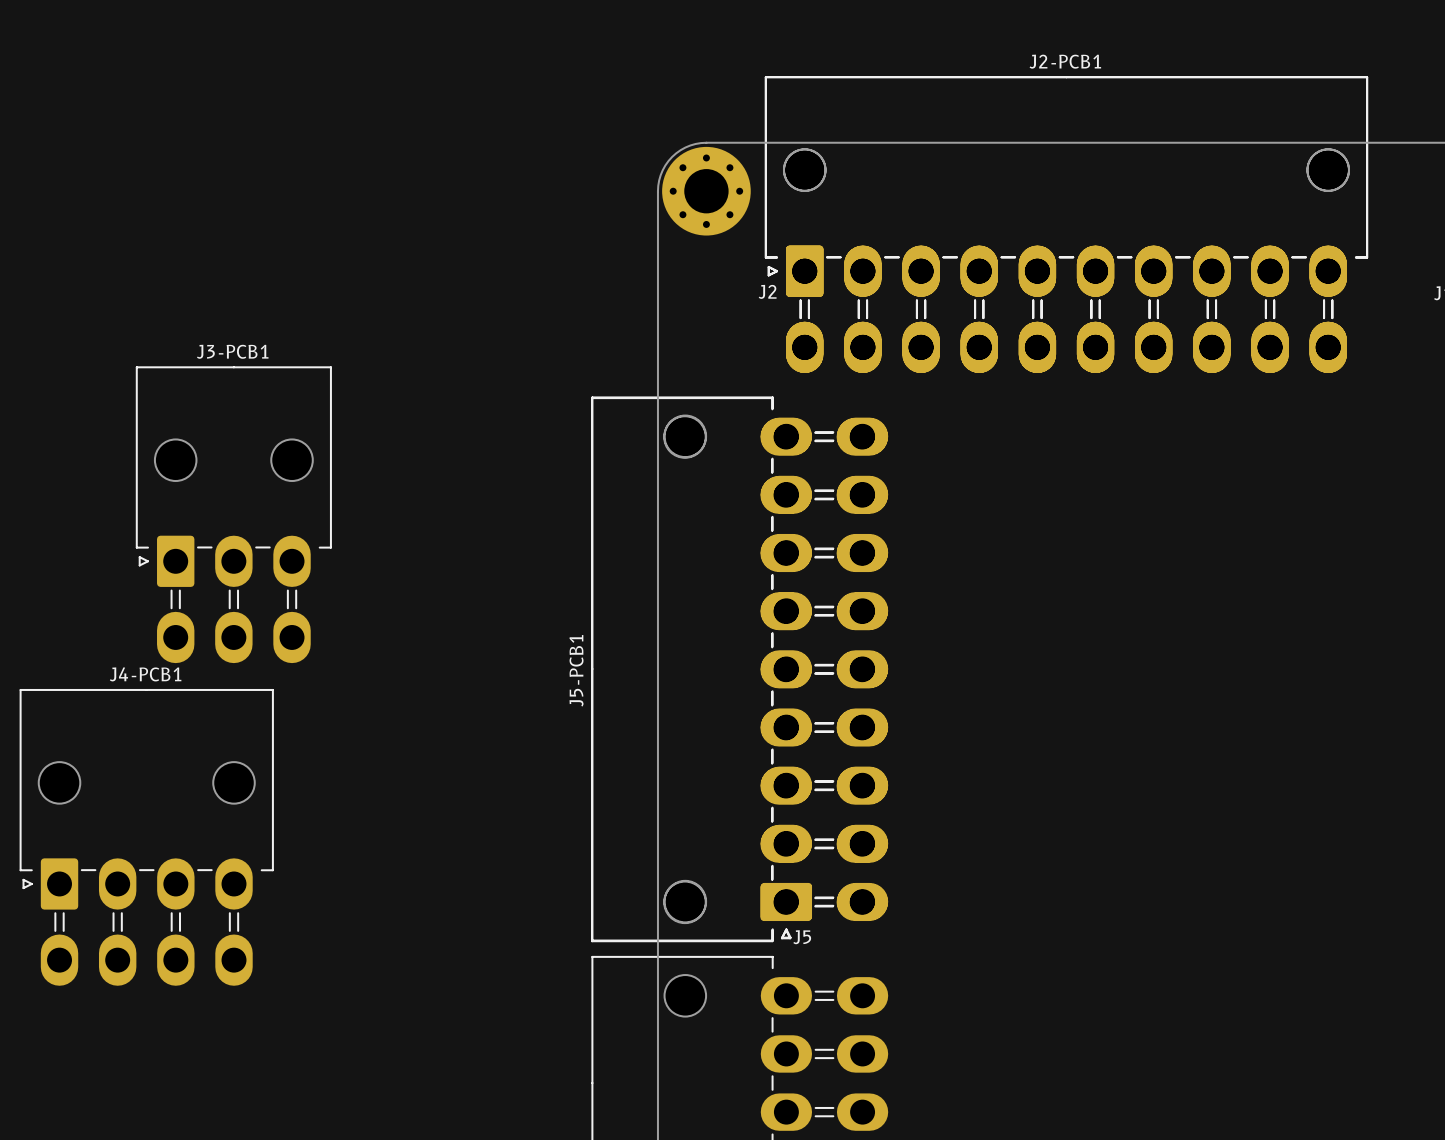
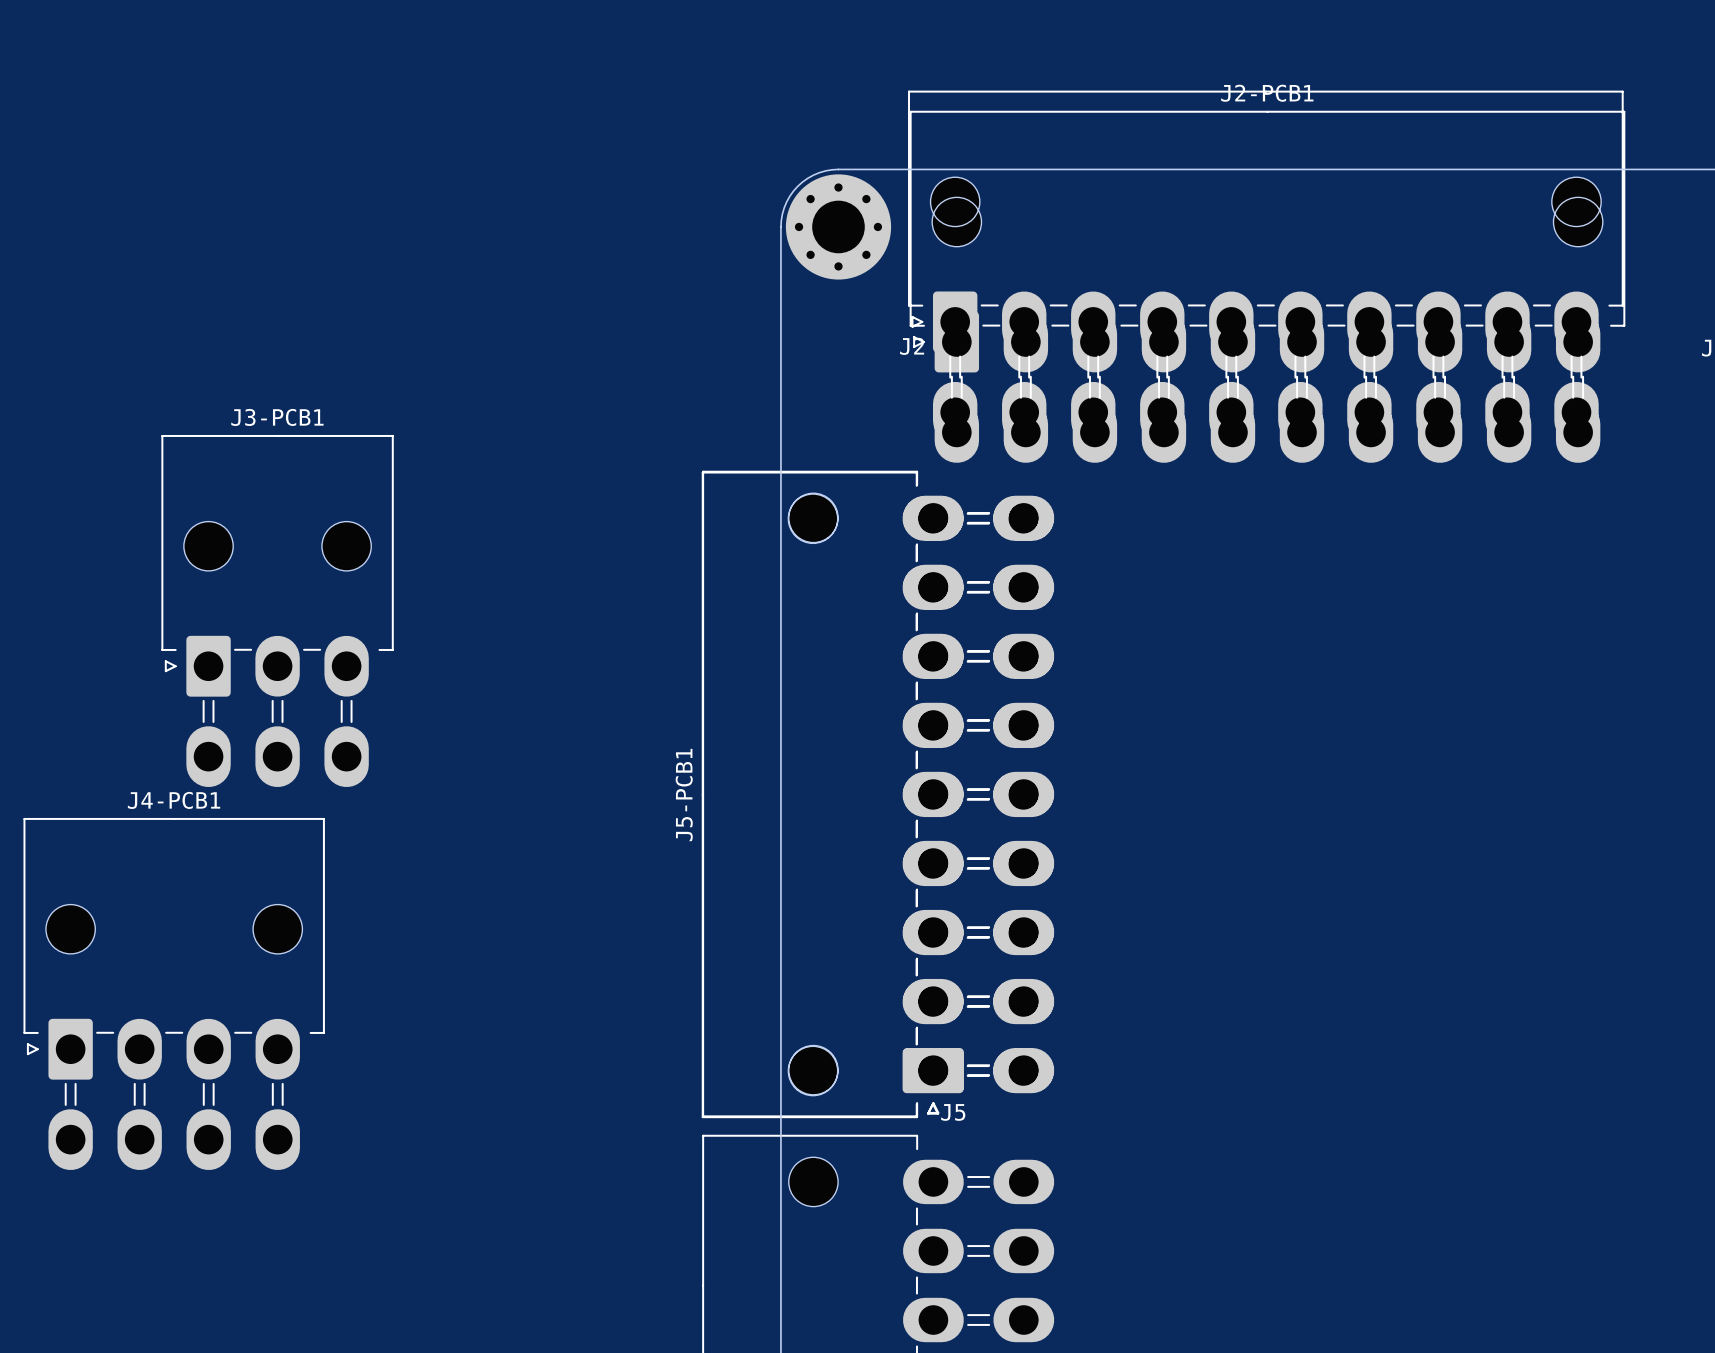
J2-PCB1 position: (1066, 224) -> (1267, 286)

